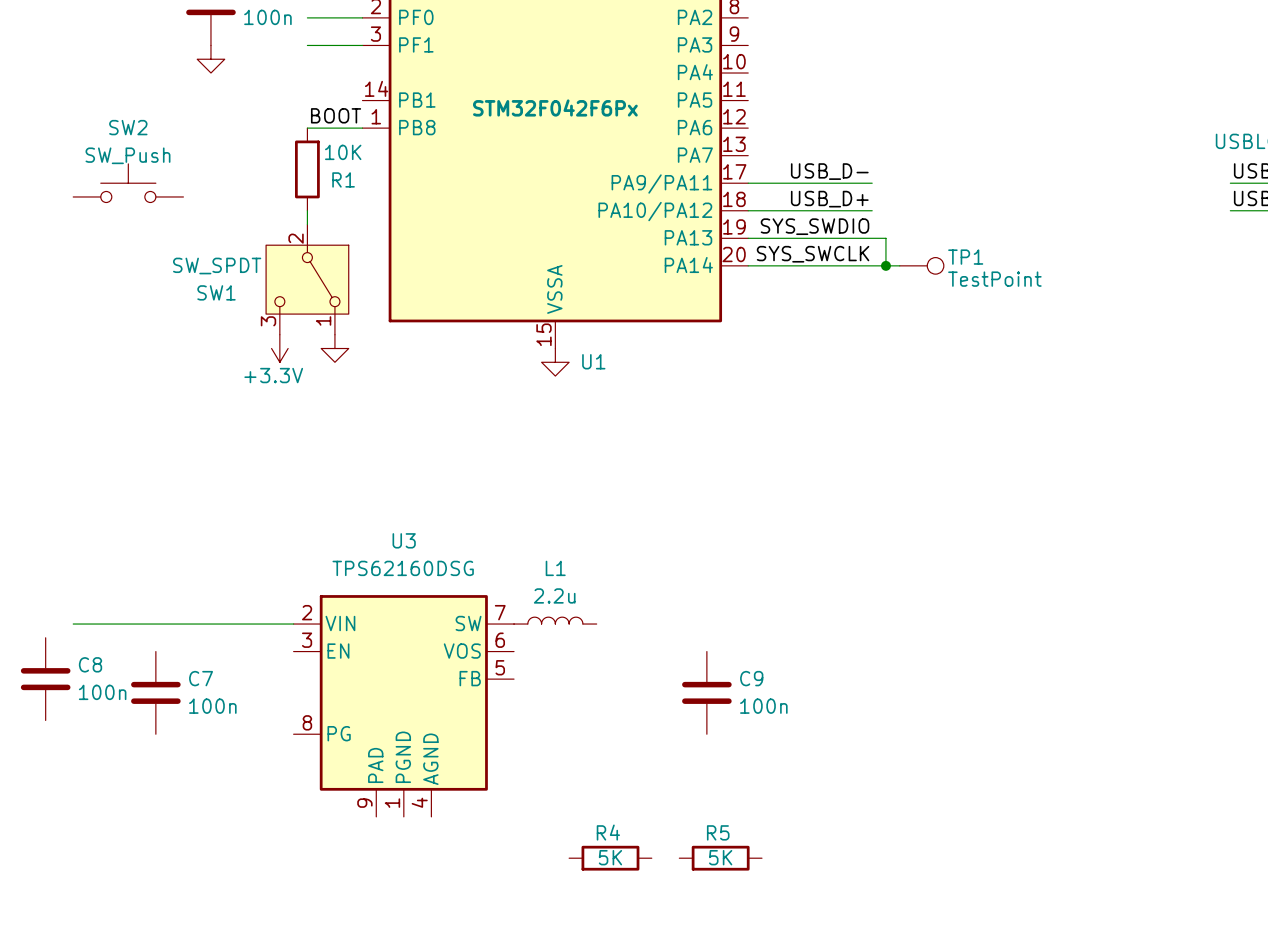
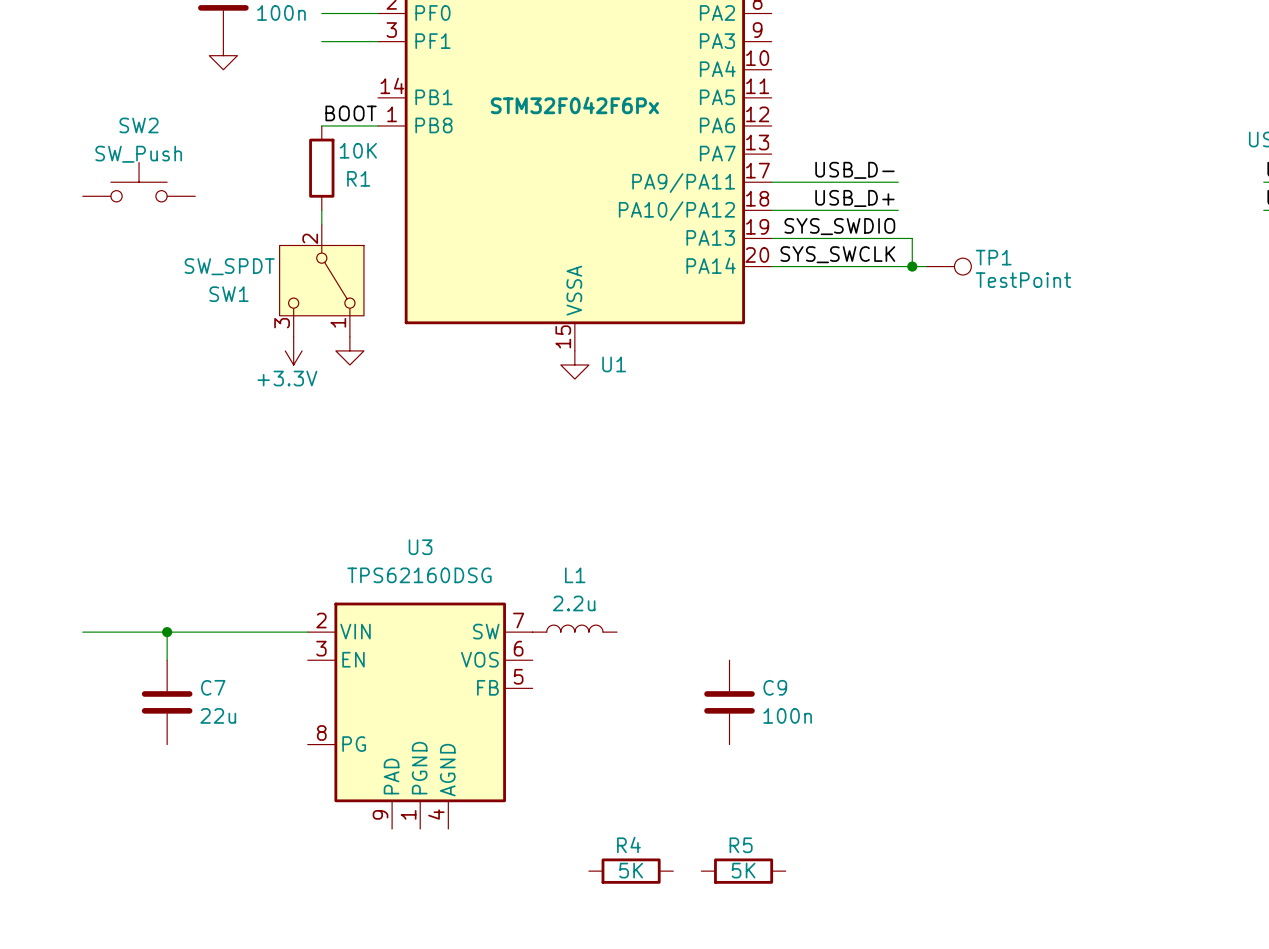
wire: none -> (167, 632) (167, 660)
junction: none -> (167, 632)
C8: 100n (45, 679) -> none
C7 value: 100n (212, 706) -> 22u (218, 715)

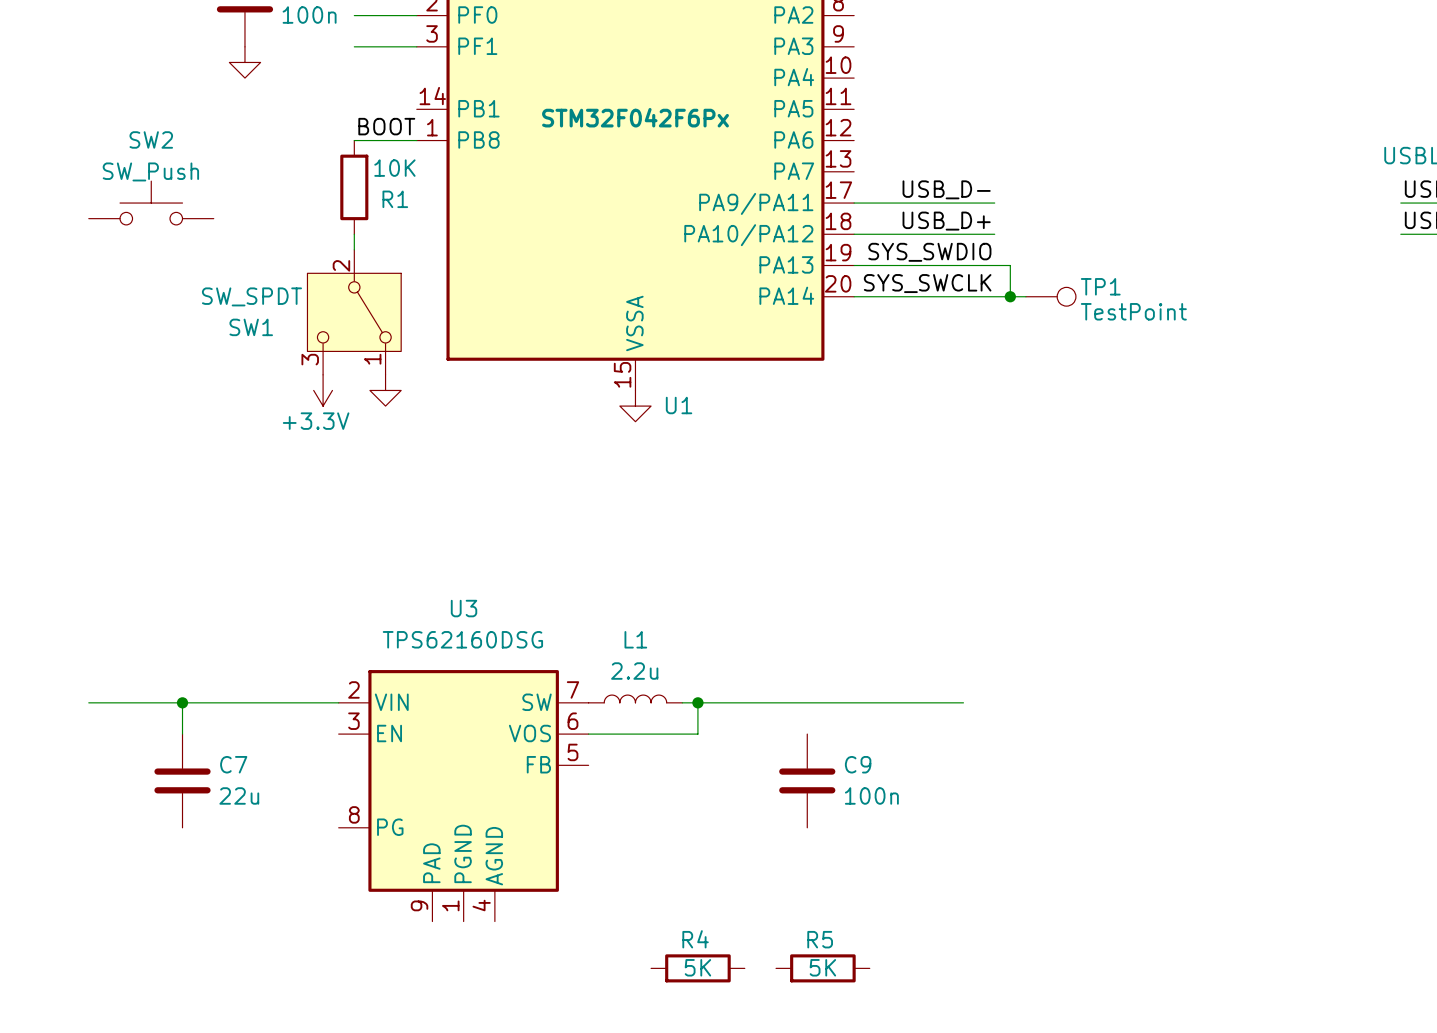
wire: none -> (682, 702) (963, 702)
wire: none -> (697, 702) (697, 734) (588, 734)
junction: none -> (697, 702)

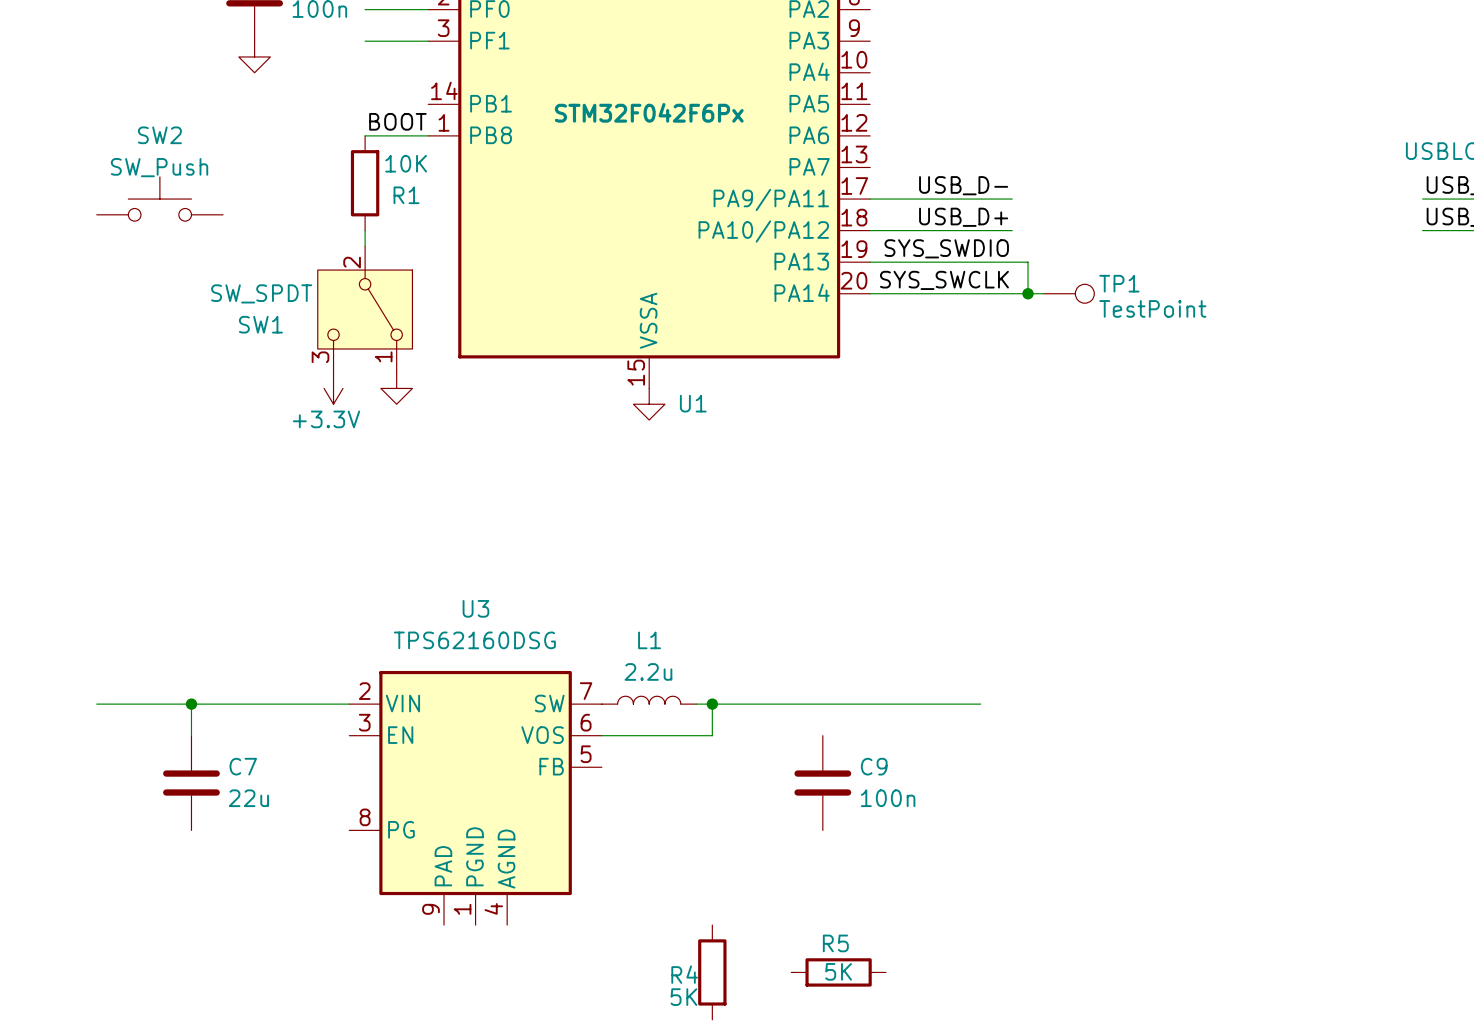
R4 name position: R4 (695, 939) -> R4 (684, 974)
R4 value position: 5K (697, 967) -> 5K (683, 997)
R4 rotation: 0° (697, 968) -> 90° clockwise (712, 972)

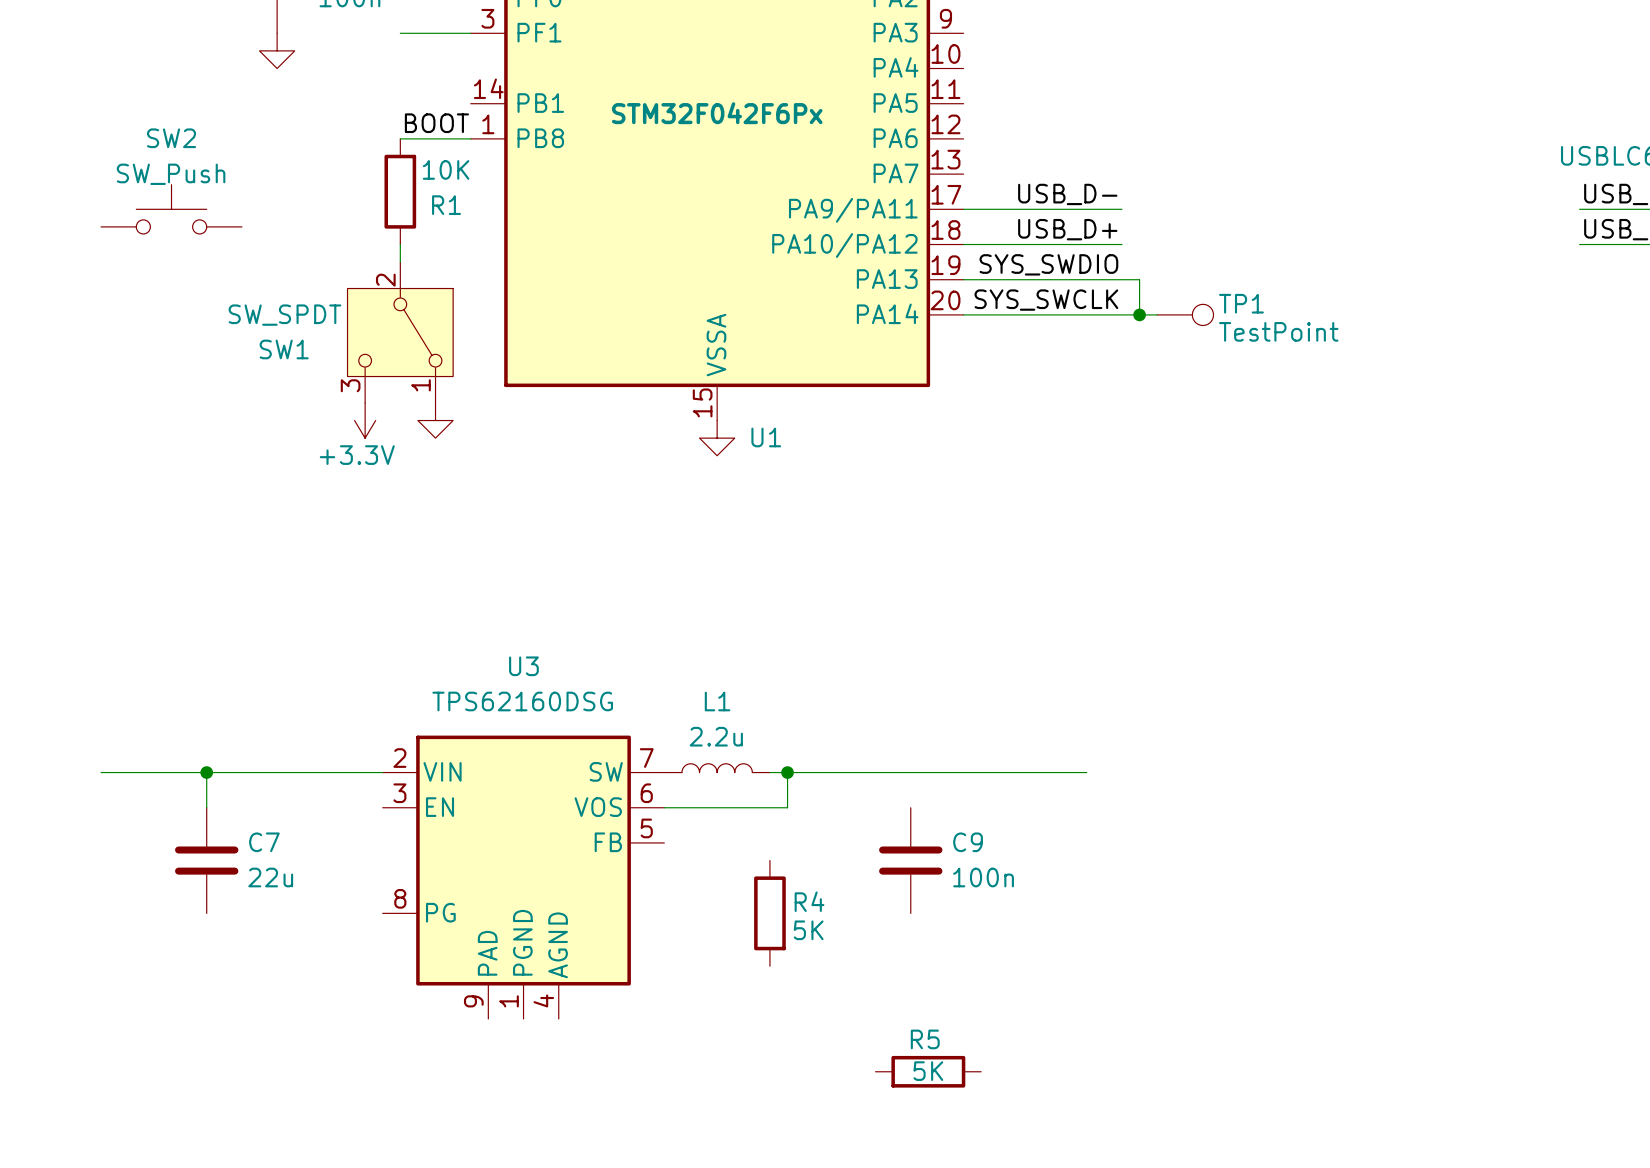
R4 position: (712, 972) -> (769, 913)
R4 name position: R4 (684, 974) -> R4 (809, 901)
R4 value position: 5K (683, 997) -> 5K (808, 930)

